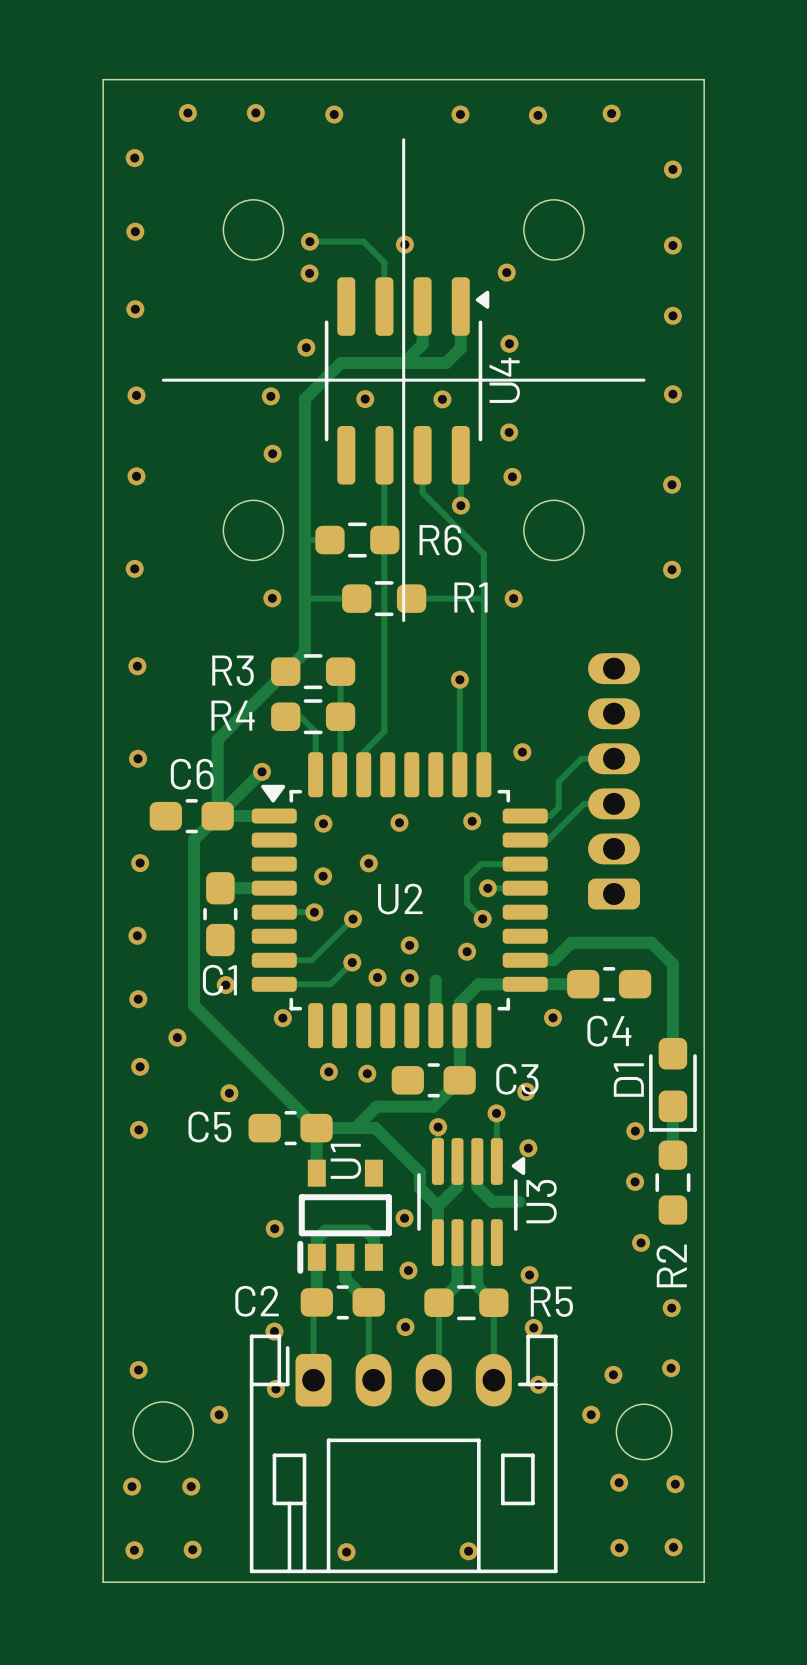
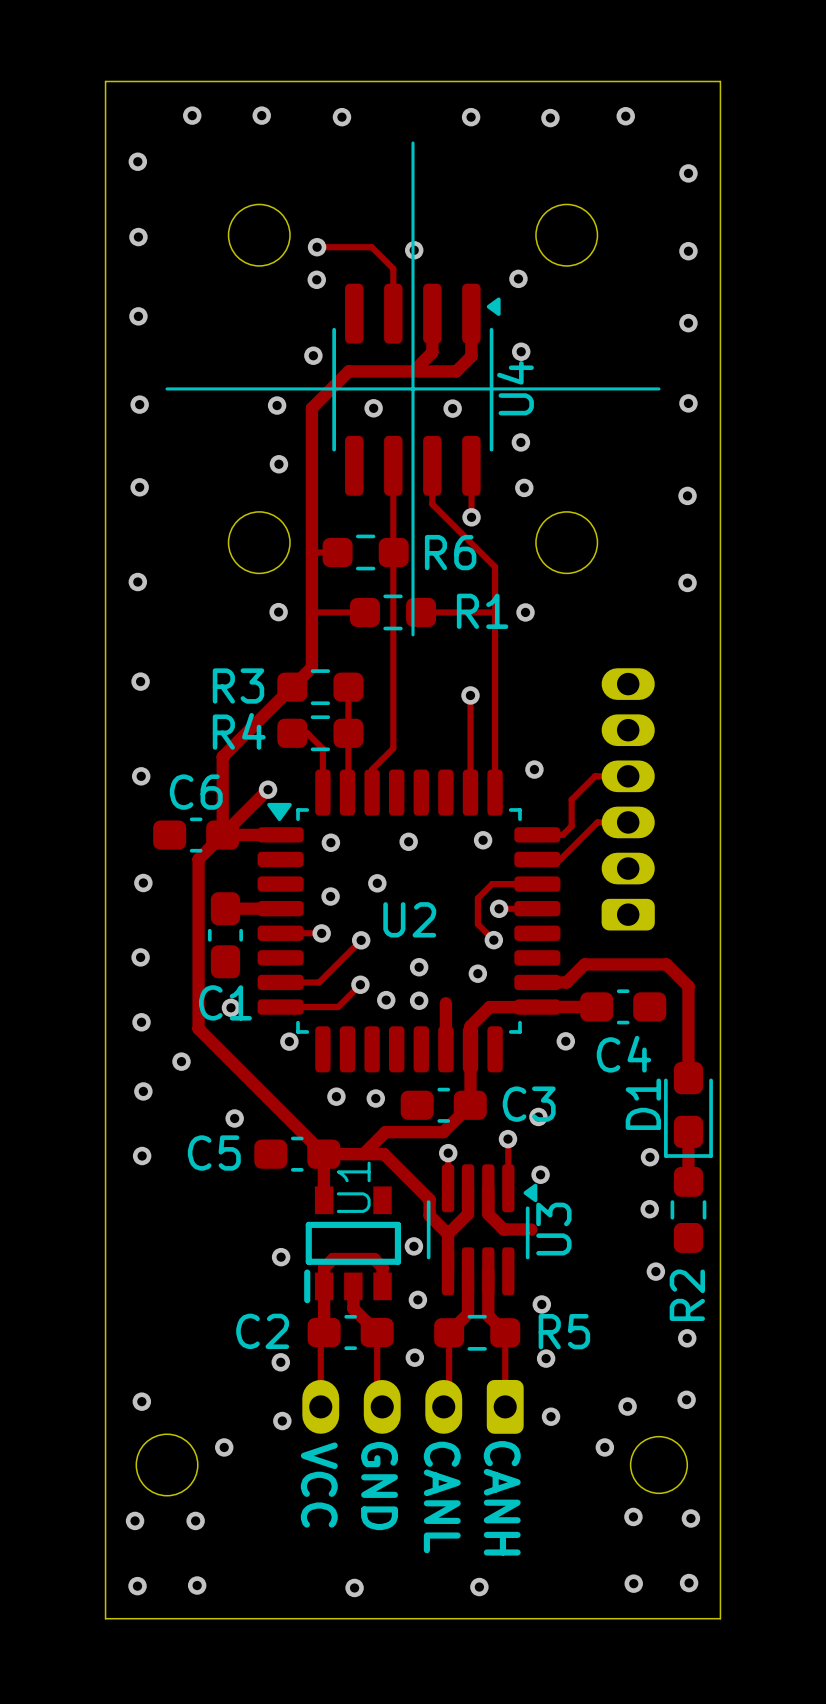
text: none -> GND (379, 1486)
text: none -> VCC (319, 1485)
part side: top (403, 1453) -> bottom (412, 1406)
text: none -> CANL (442, 1497)
text: none -> CANH (502, 1498)

